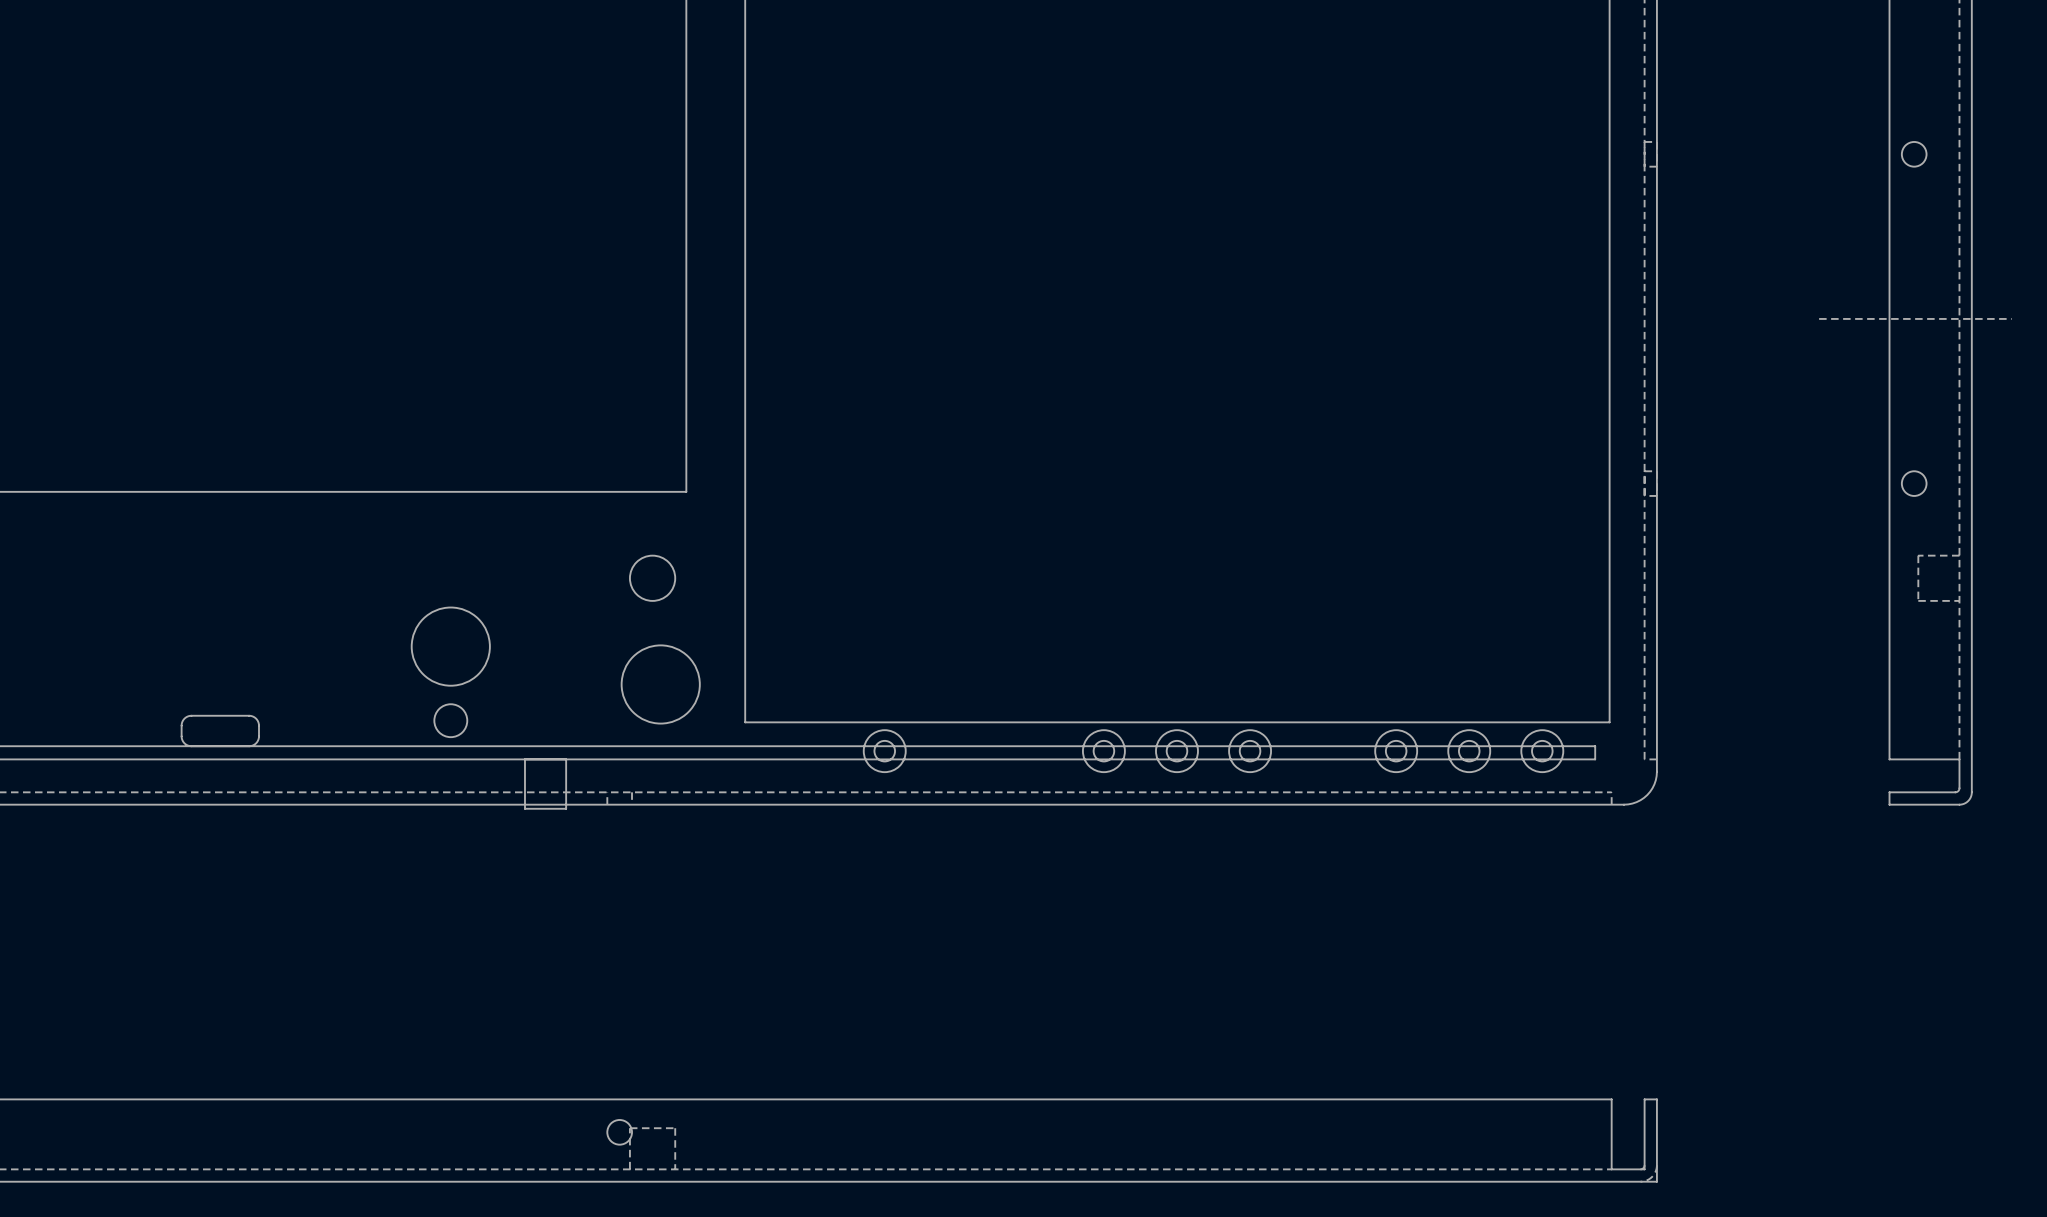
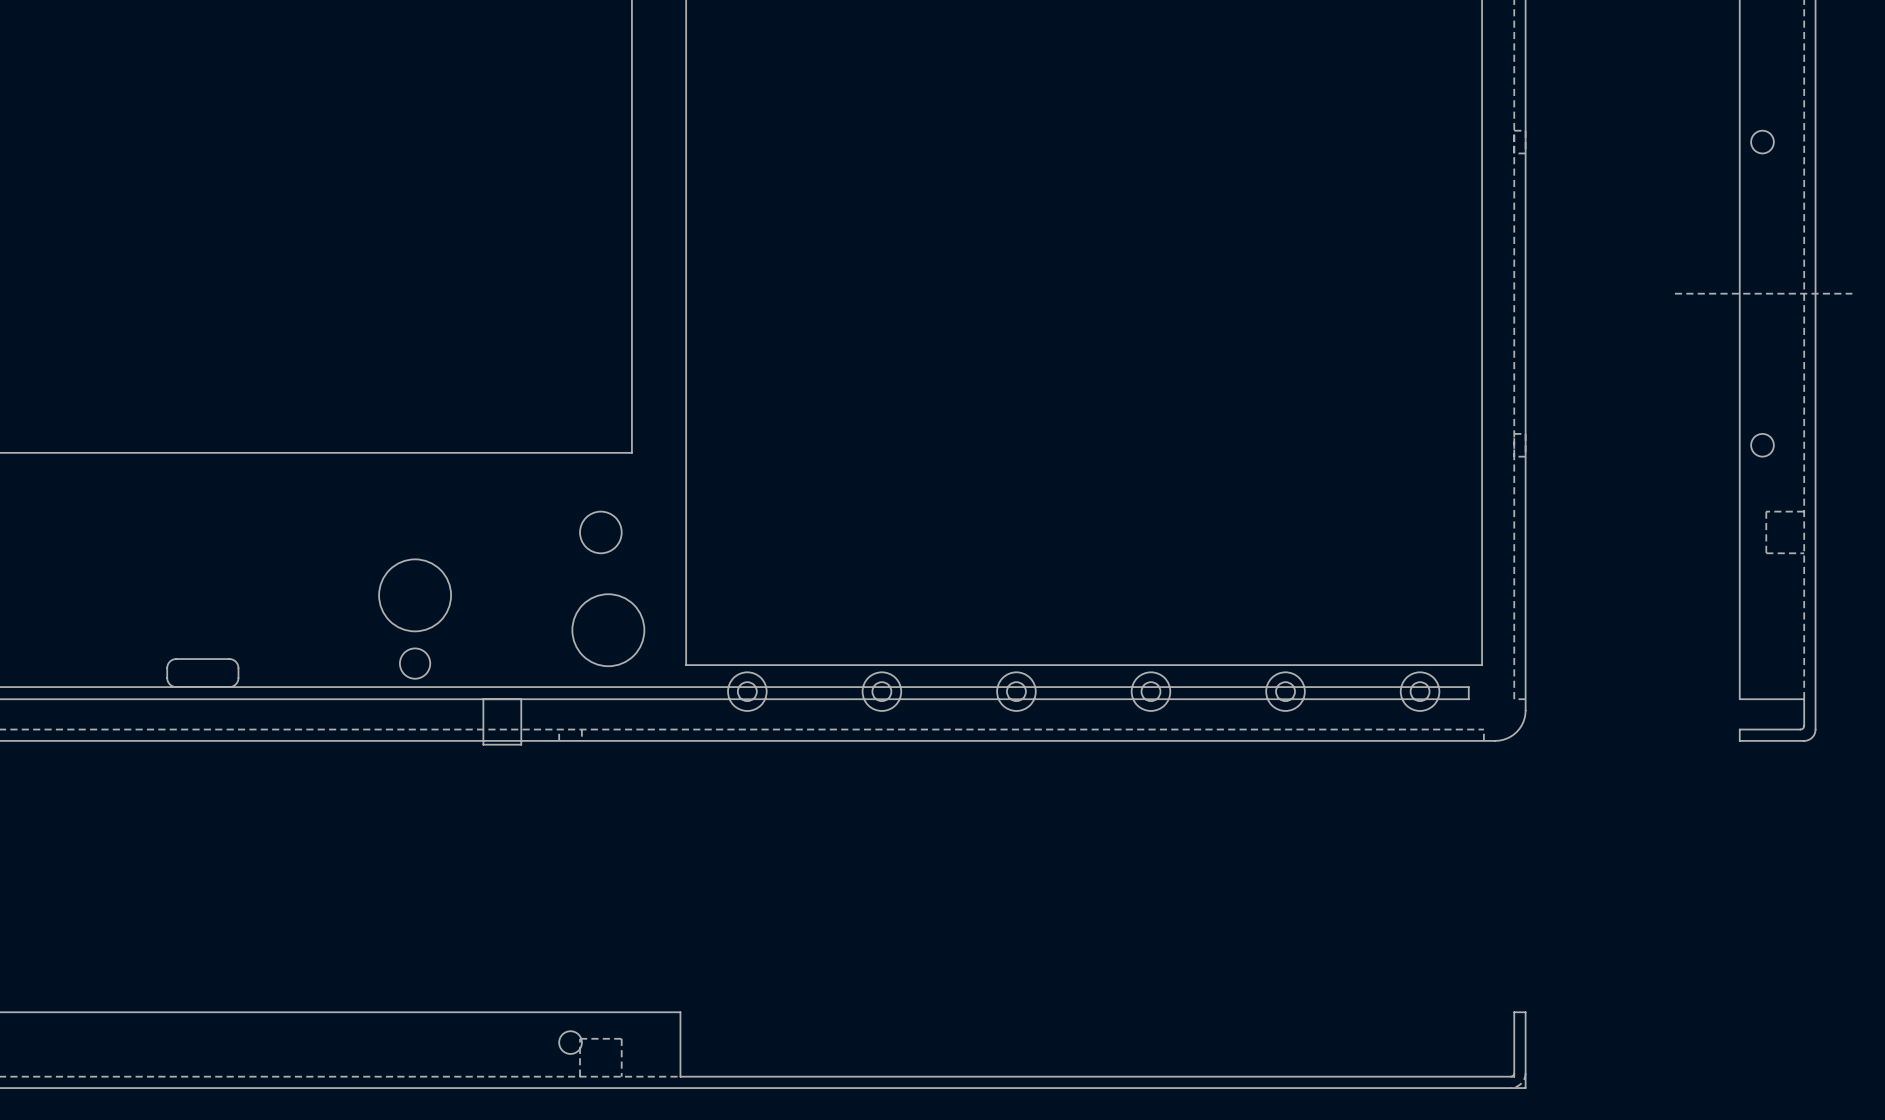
drawing: none -> [727, 671, 768, 712]
drawing: [863, 729, 907, 773] -> none
drawing: none -> [862, 671, 902, 712]
drawing: [1155, 729, 1199, 773] -> none
drawing: [1447, 729, 1491, 773] -> none
line: (739, 1099) (1611, 1099) (1611, 1169) (739, 1169) -> (680, 1012) (680, 1076) (1483, 1076)

